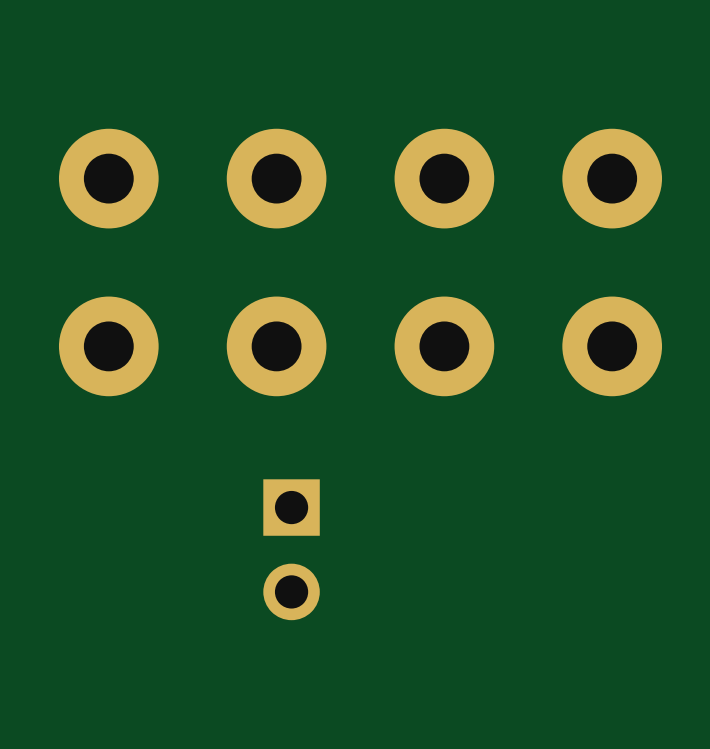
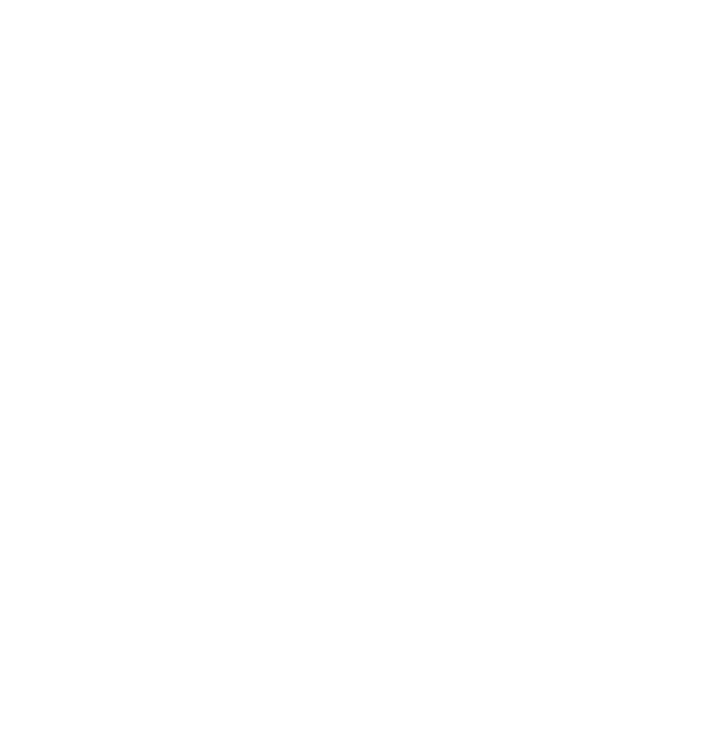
part: (108, 178) -> none
part: (276, 178) -> none
part: (444, 178) -> none
part: (612, 178) -> none
part: (108, 346) -> none
part: (276, 346) -> none
part: (444, 346) -> none
part: (612, 346) -> none
part: (291, 549) -> none

